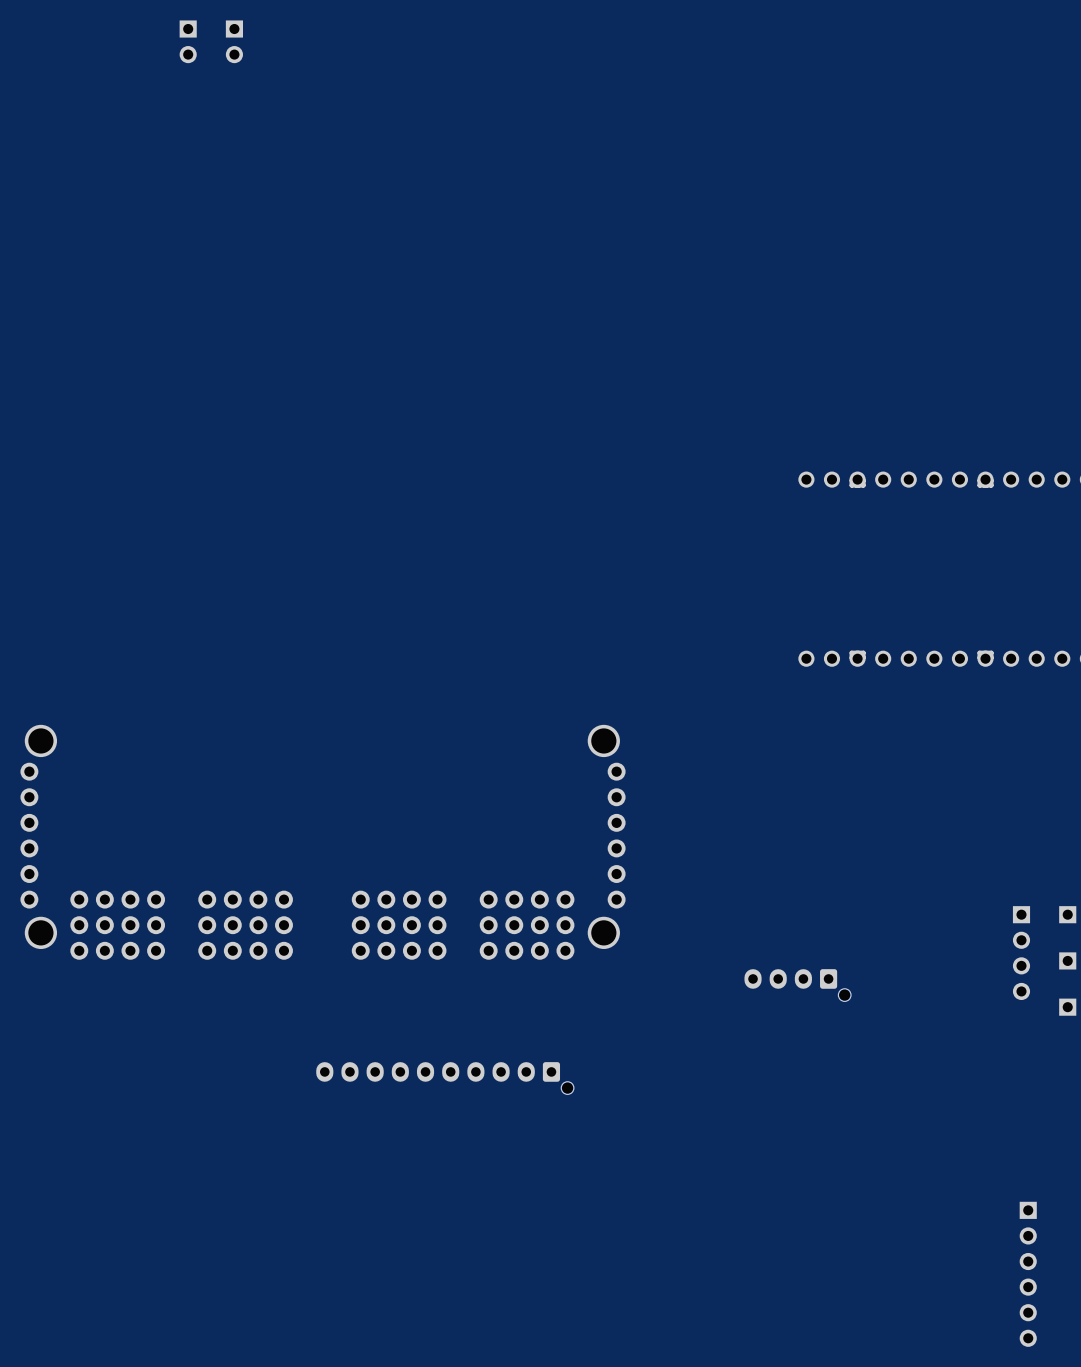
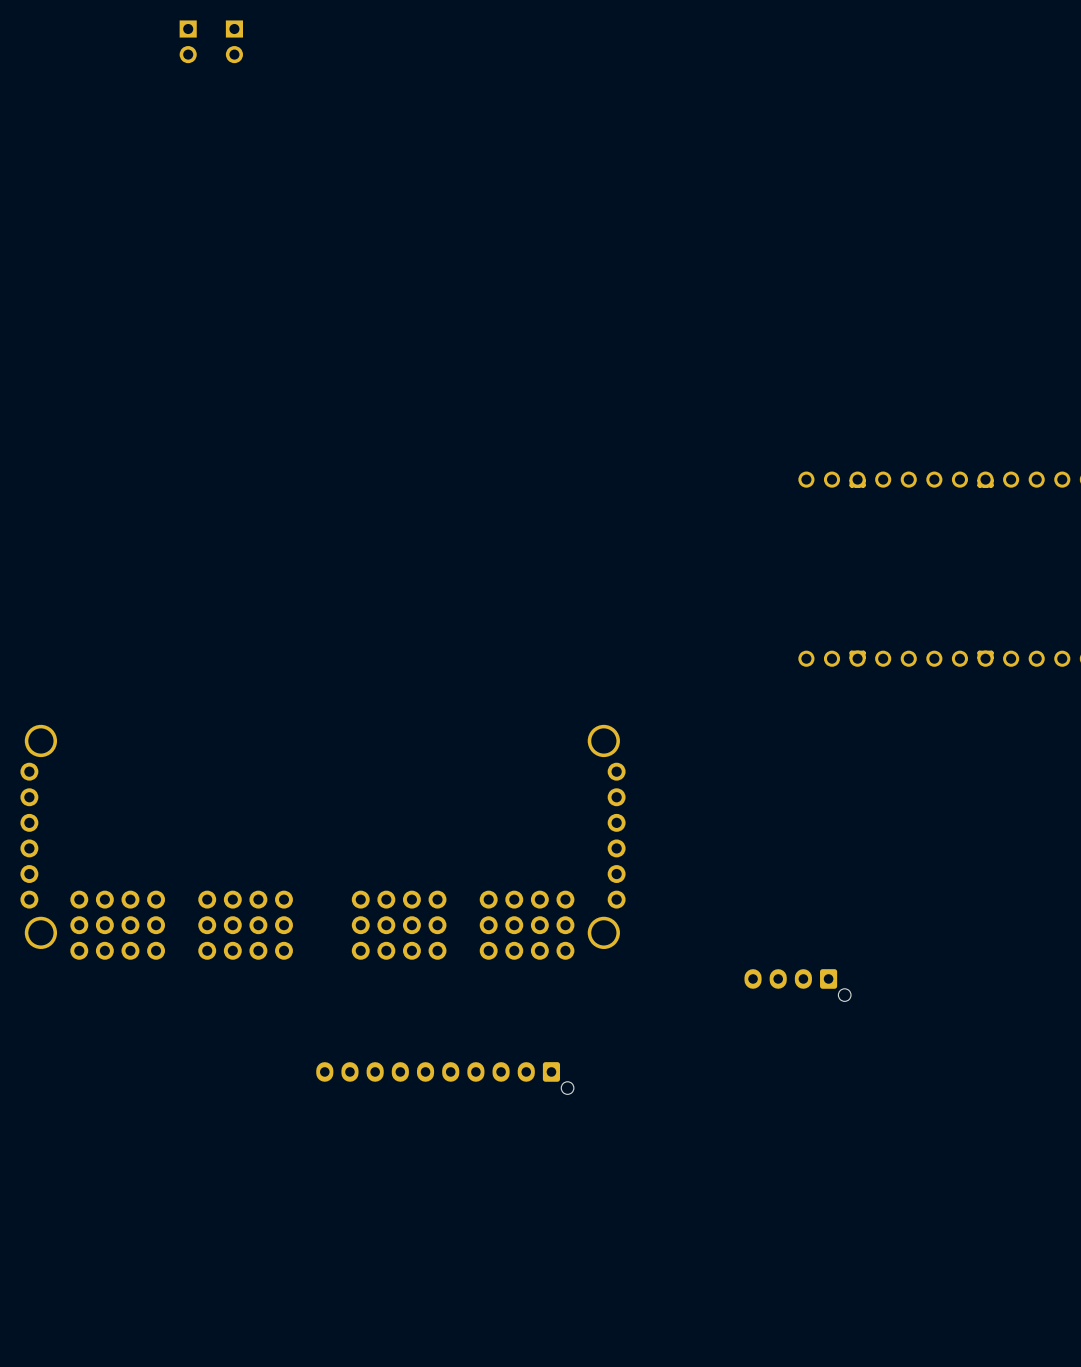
part: (1067, 914) -> none
part: (1021, 953) -> none
part: (1067, 960) -> none
part: (1067, 1007) -> none
part: (1028, 1274) -> none

